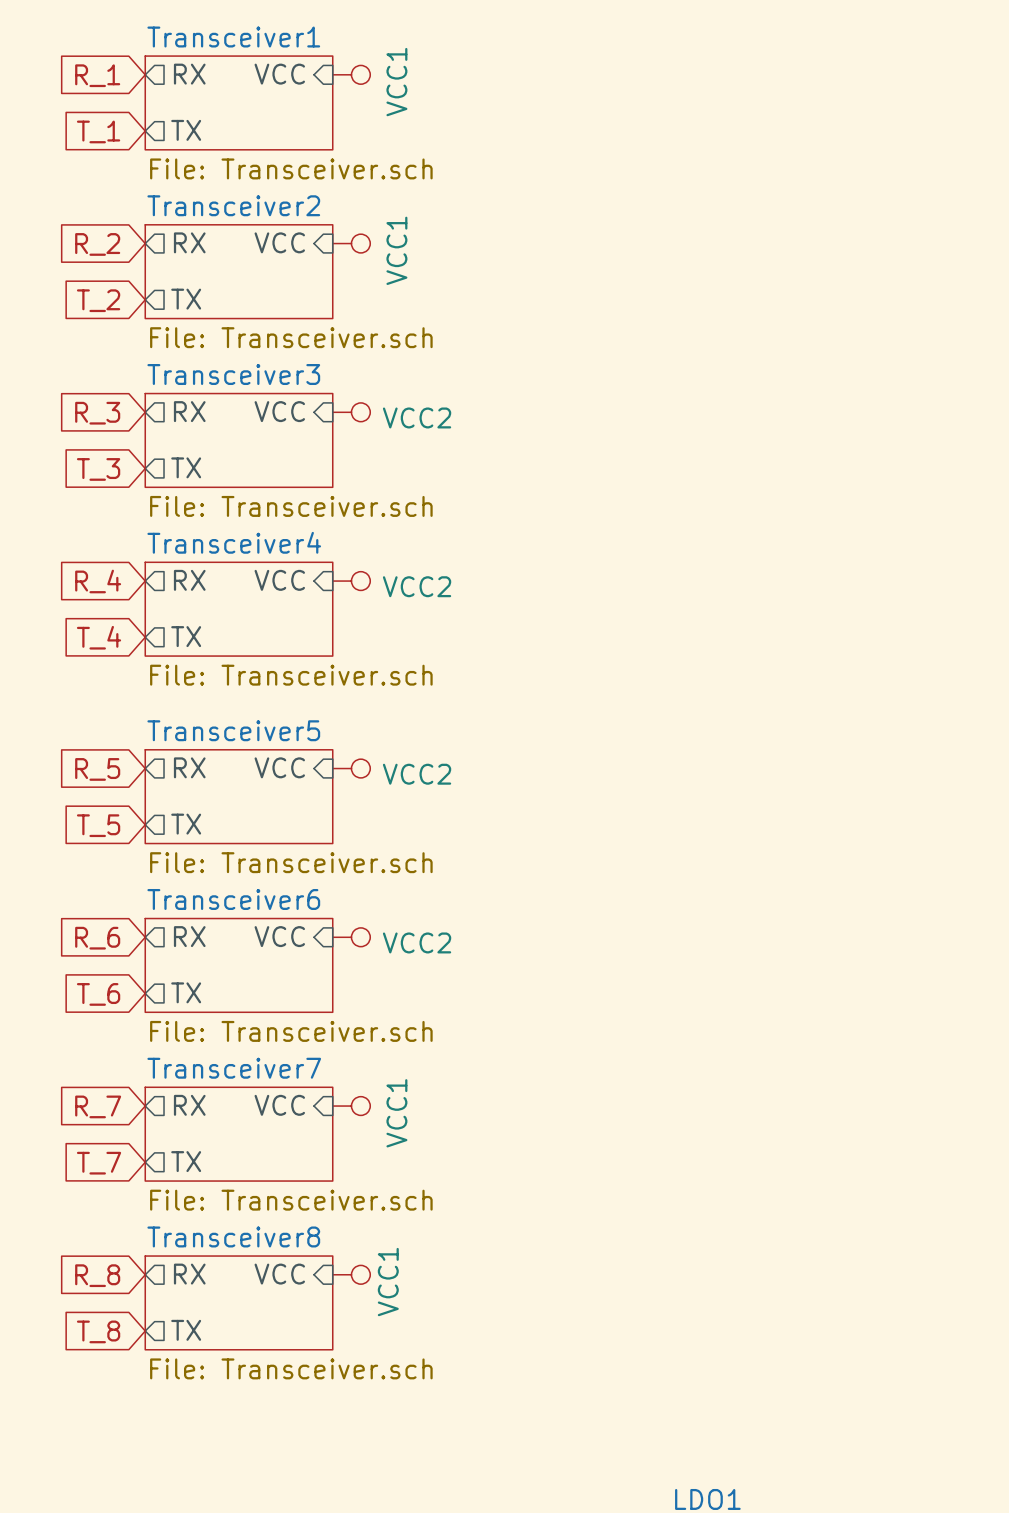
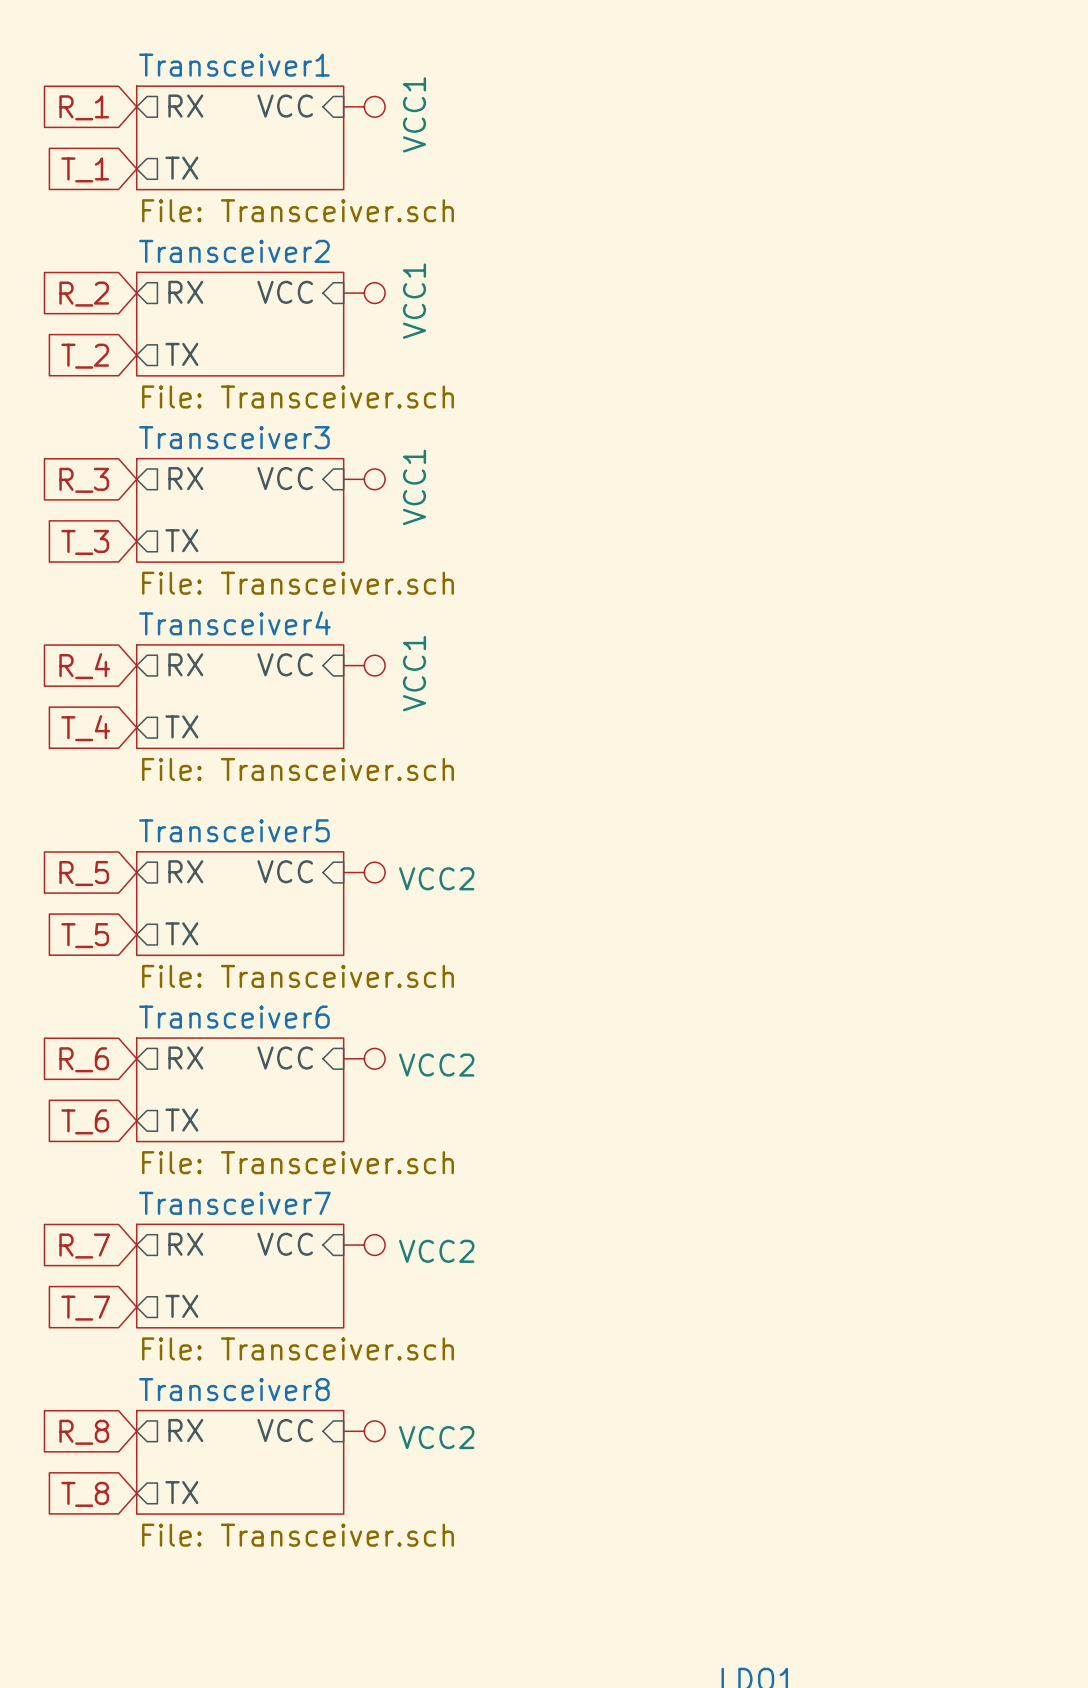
power symbol: VCC2 (351, 412) -> VCC1 (364, 479)
power symbol: VCC2 (351, 581) -> VCC1 (364, 665)
power symbol: VCC1 (351, 1106) -> VCC2 (364, 1245)
power symbol: VCC1 (351, 1274) -> VCC2 (364, 1431)

